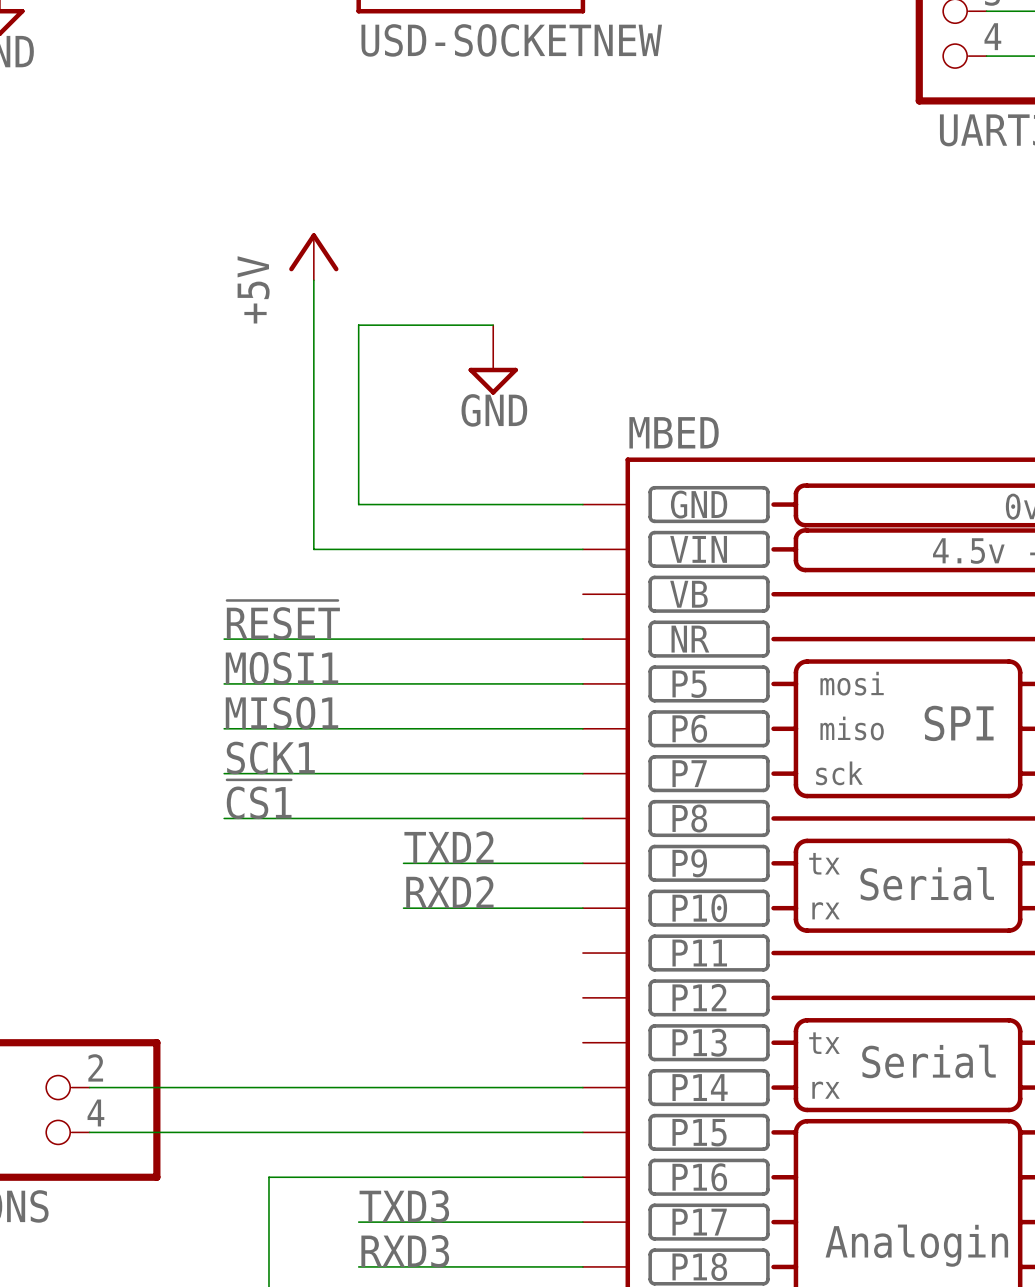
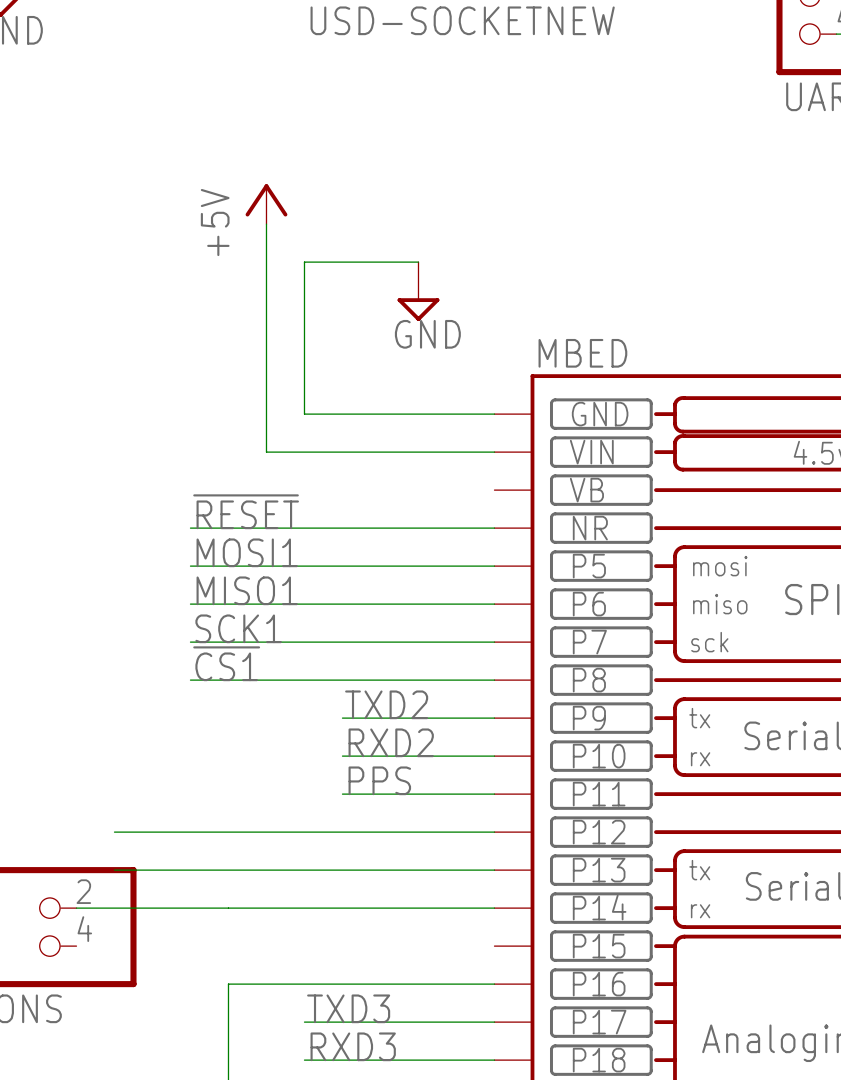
label: none -> PPS (379, 780)
wire: none -> (342, 794) (494, 794)
wire: none -> (114, 832) (494, 832)
wire: none -> (114, 870) (494, 870)
wire: (89, 1132) (582, 1132) -> none

